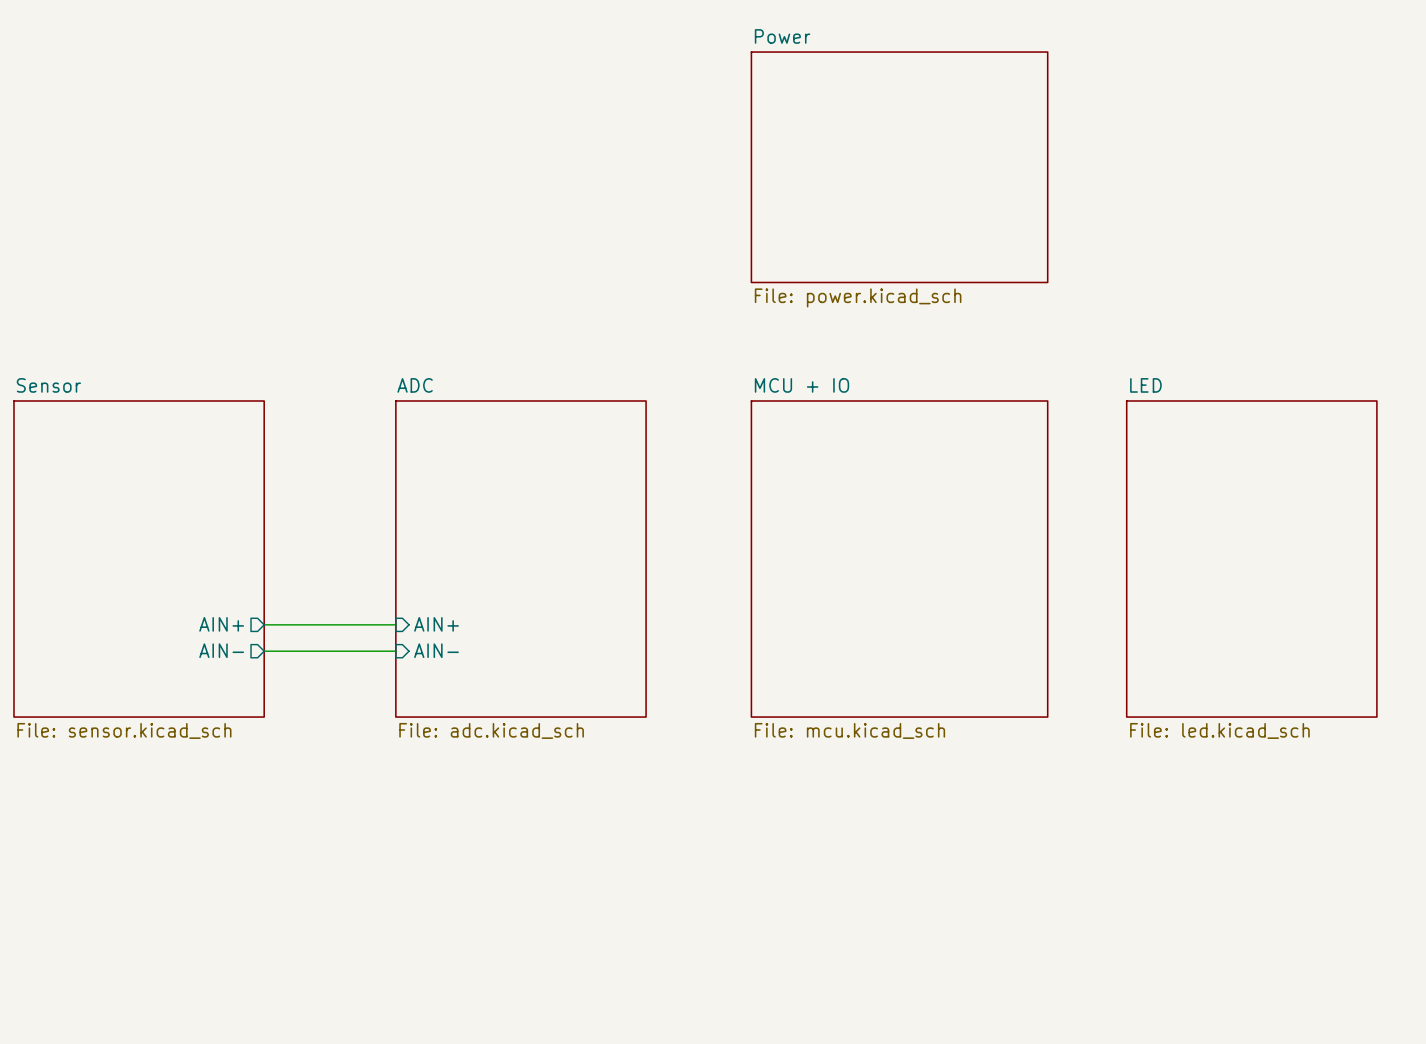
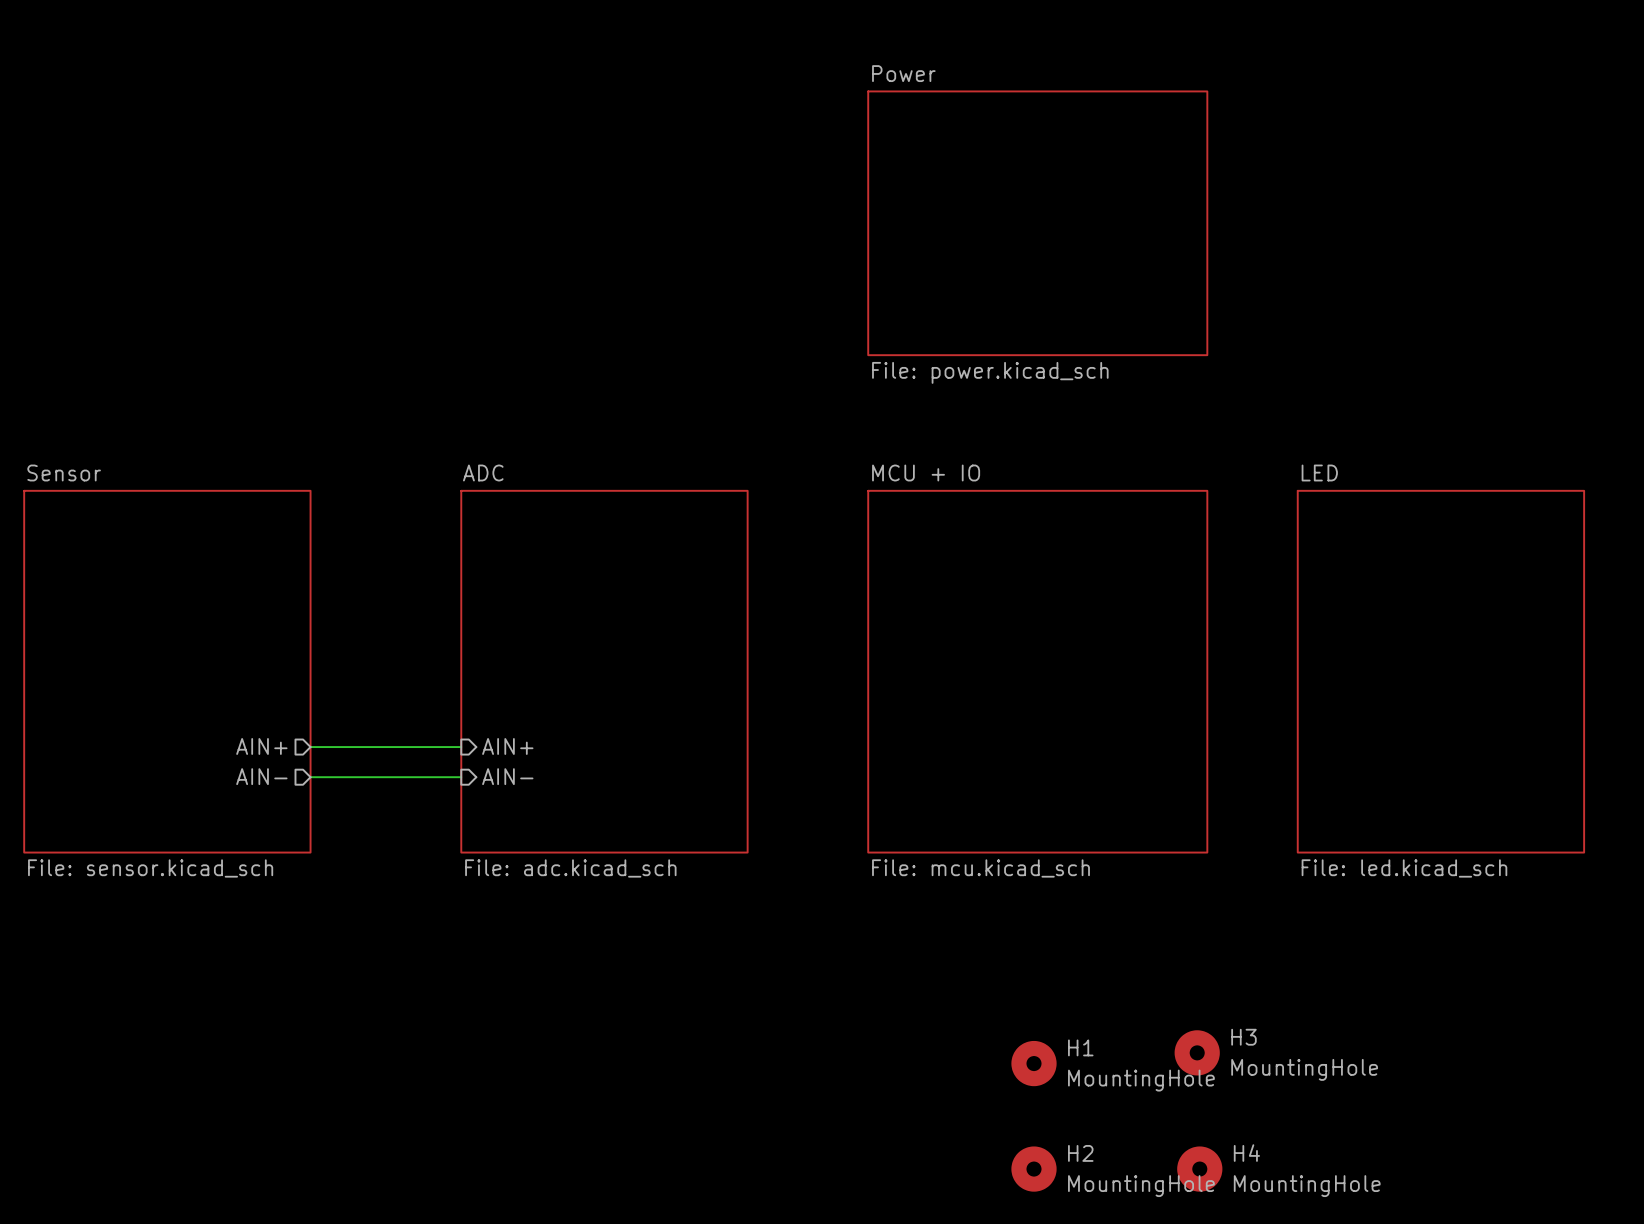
H3: none -> MountingHole (1197, 1052)
H1: none -> MountingHole (1034, 1063)
H2: none -> MountingHole (1034, 1169)
H4: none -> MountingHole (1199, 1169)

